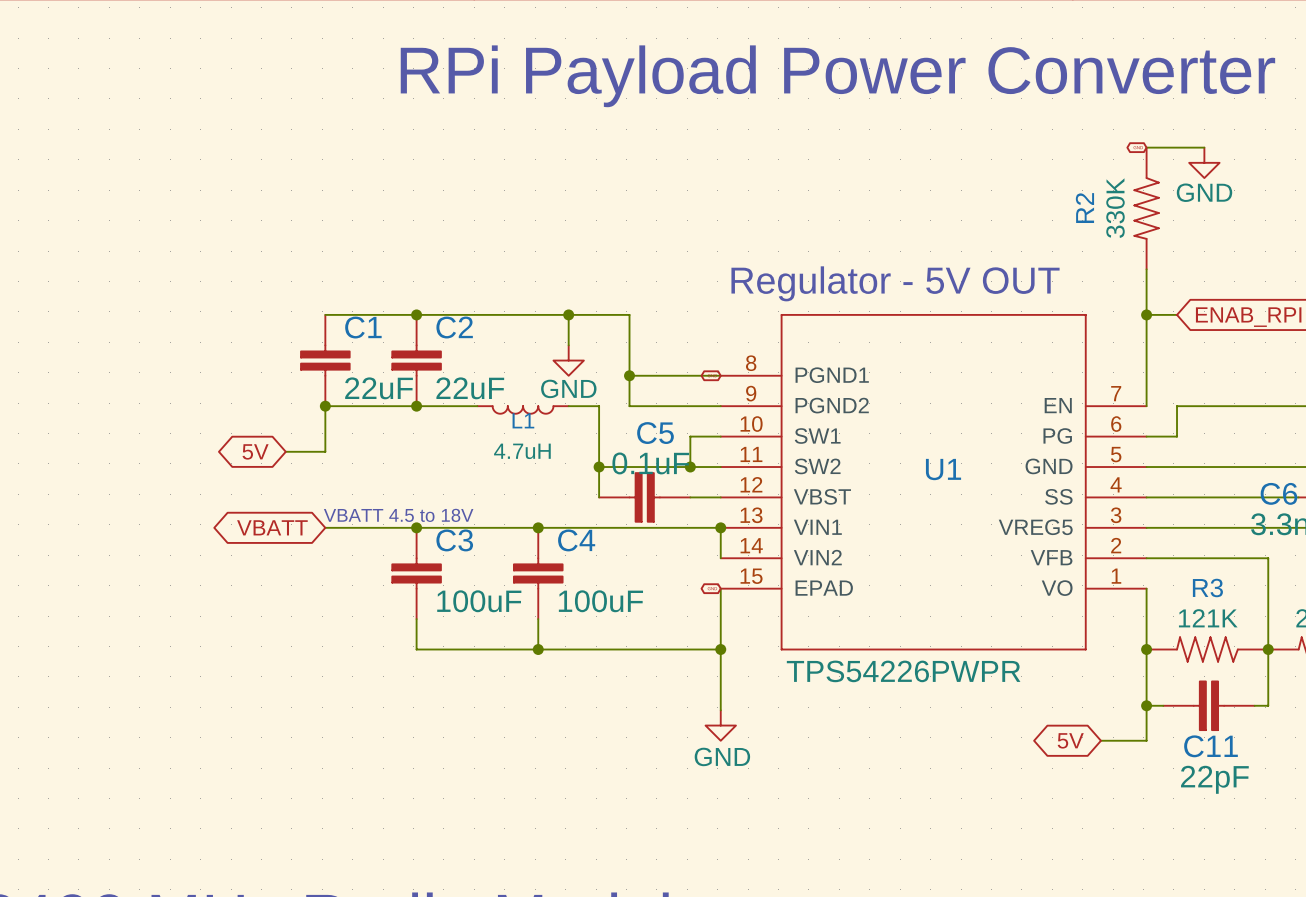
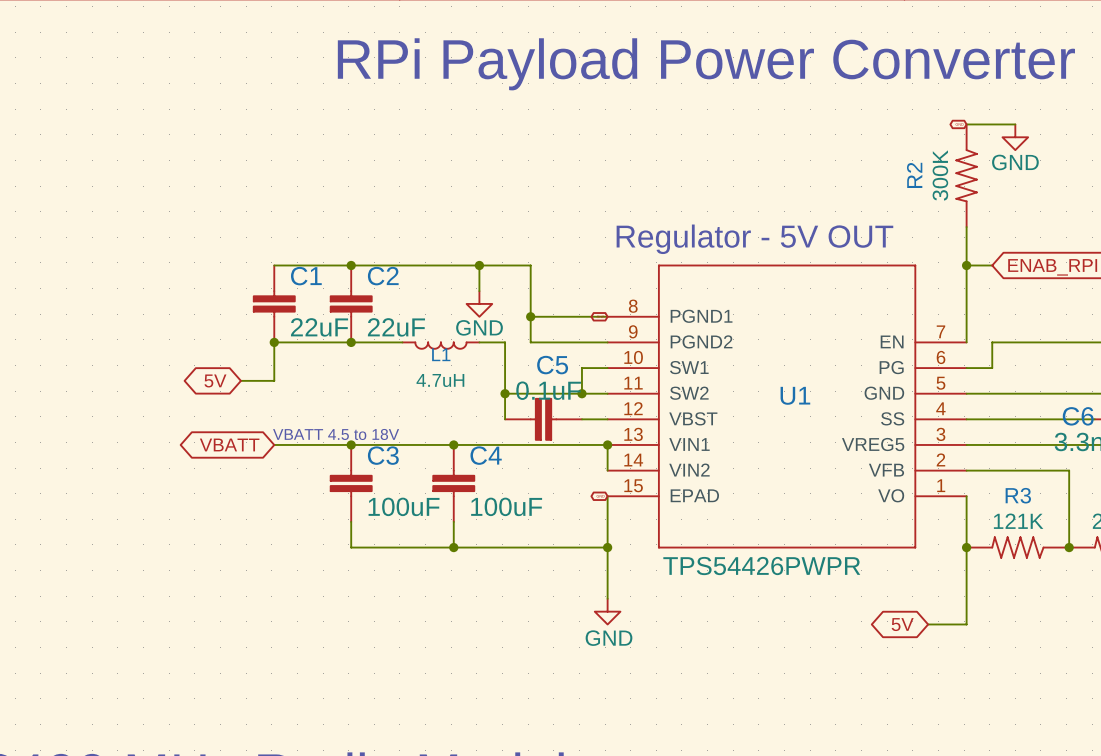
R2 value: 330K (1115, 208) -> 300K (940, 175)
wire: (1268, 649) (1268, 705) (1254, 705) -> none
U1 value: TPS54226PWPR (903, 671) -> TPS54426PWPR (761, 566)
wire: (1146, 705) (1163, 705) -> none
junction: (1146, 705) -> none
C11: 22pF (1208, 705) -> none

